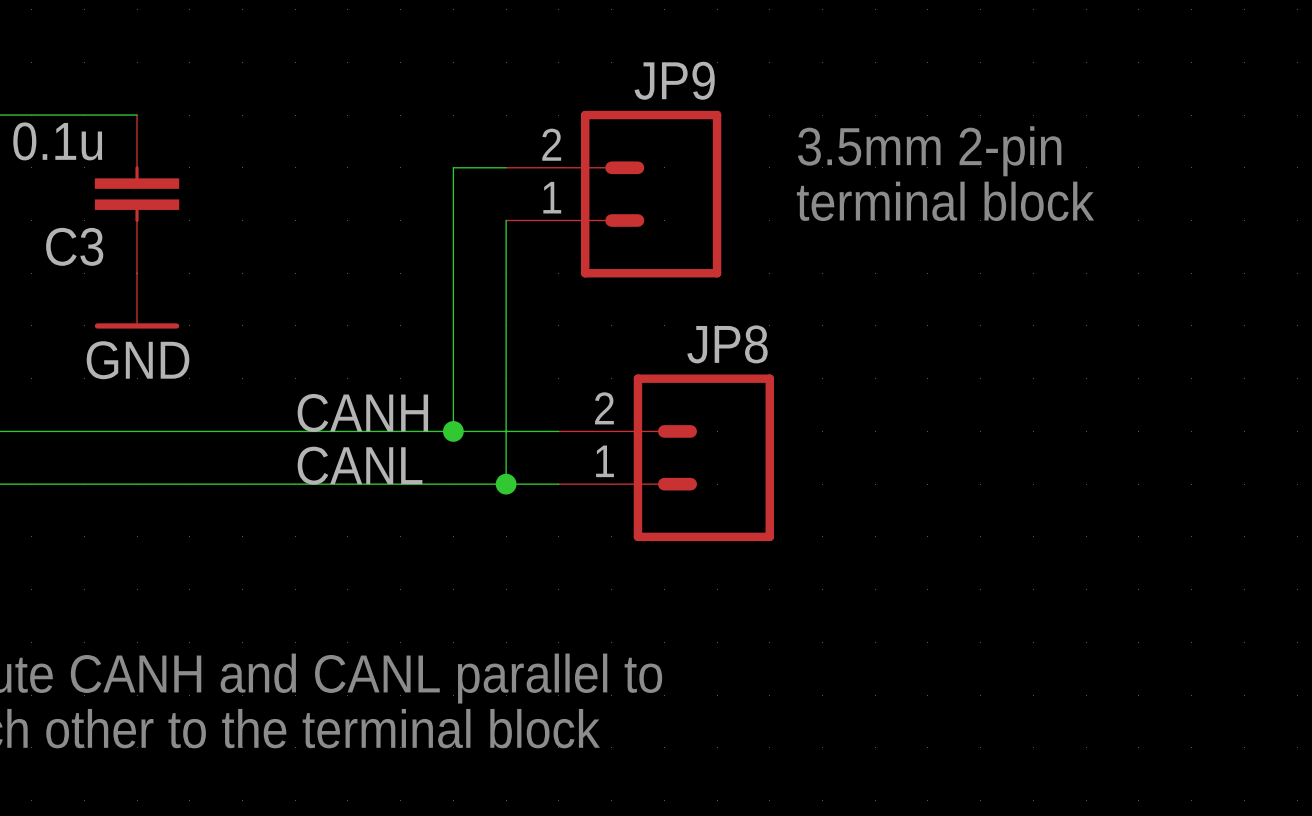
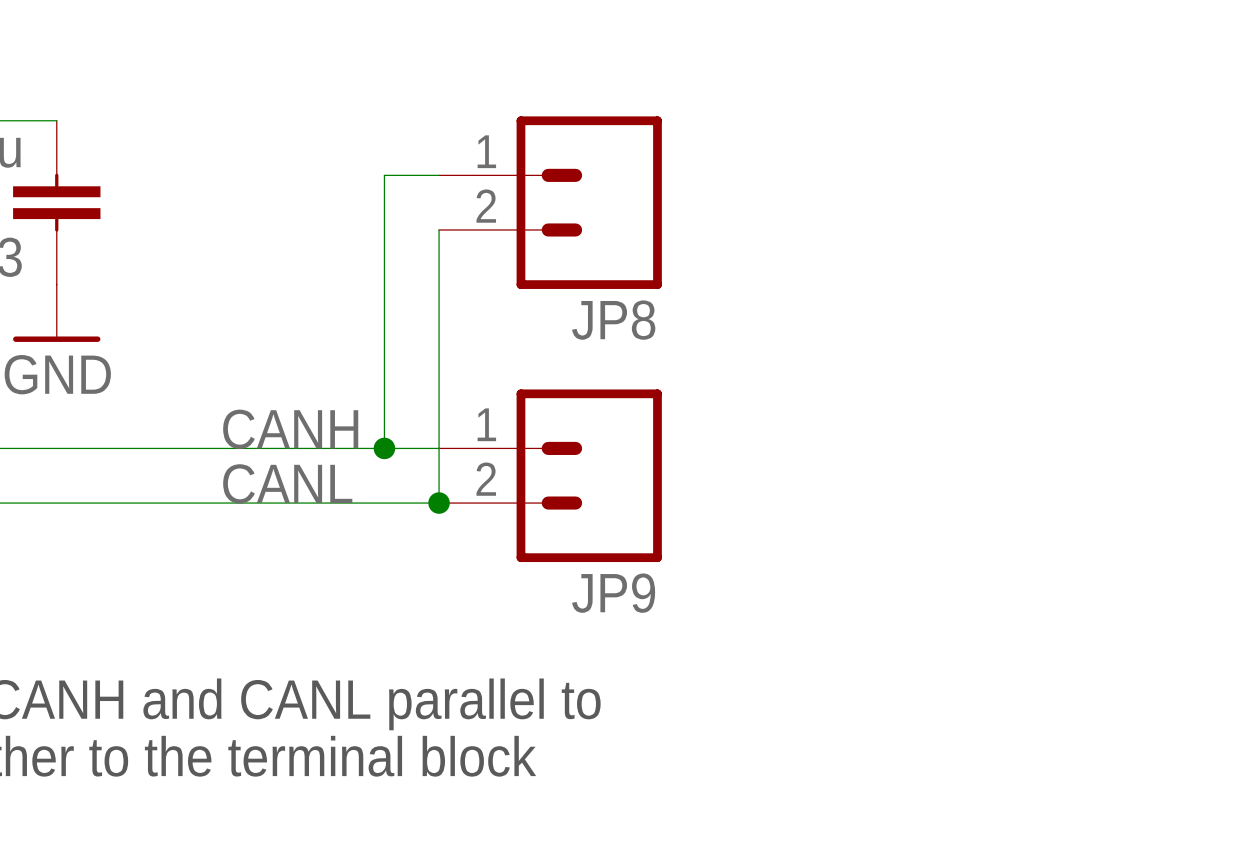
text: 3.5mm 2-pin (929, 151) -> none
JP9 position: (613, 194) -> (550, 475)
JP9 flip: as is (651, 194) -> up-down (589, 475)
text: terminal block (945, 201) -> none
JP8 position: (666, 457) -> (550, 202)
JP8 flip: as is (703, 457) -> up-down (589, 202)

